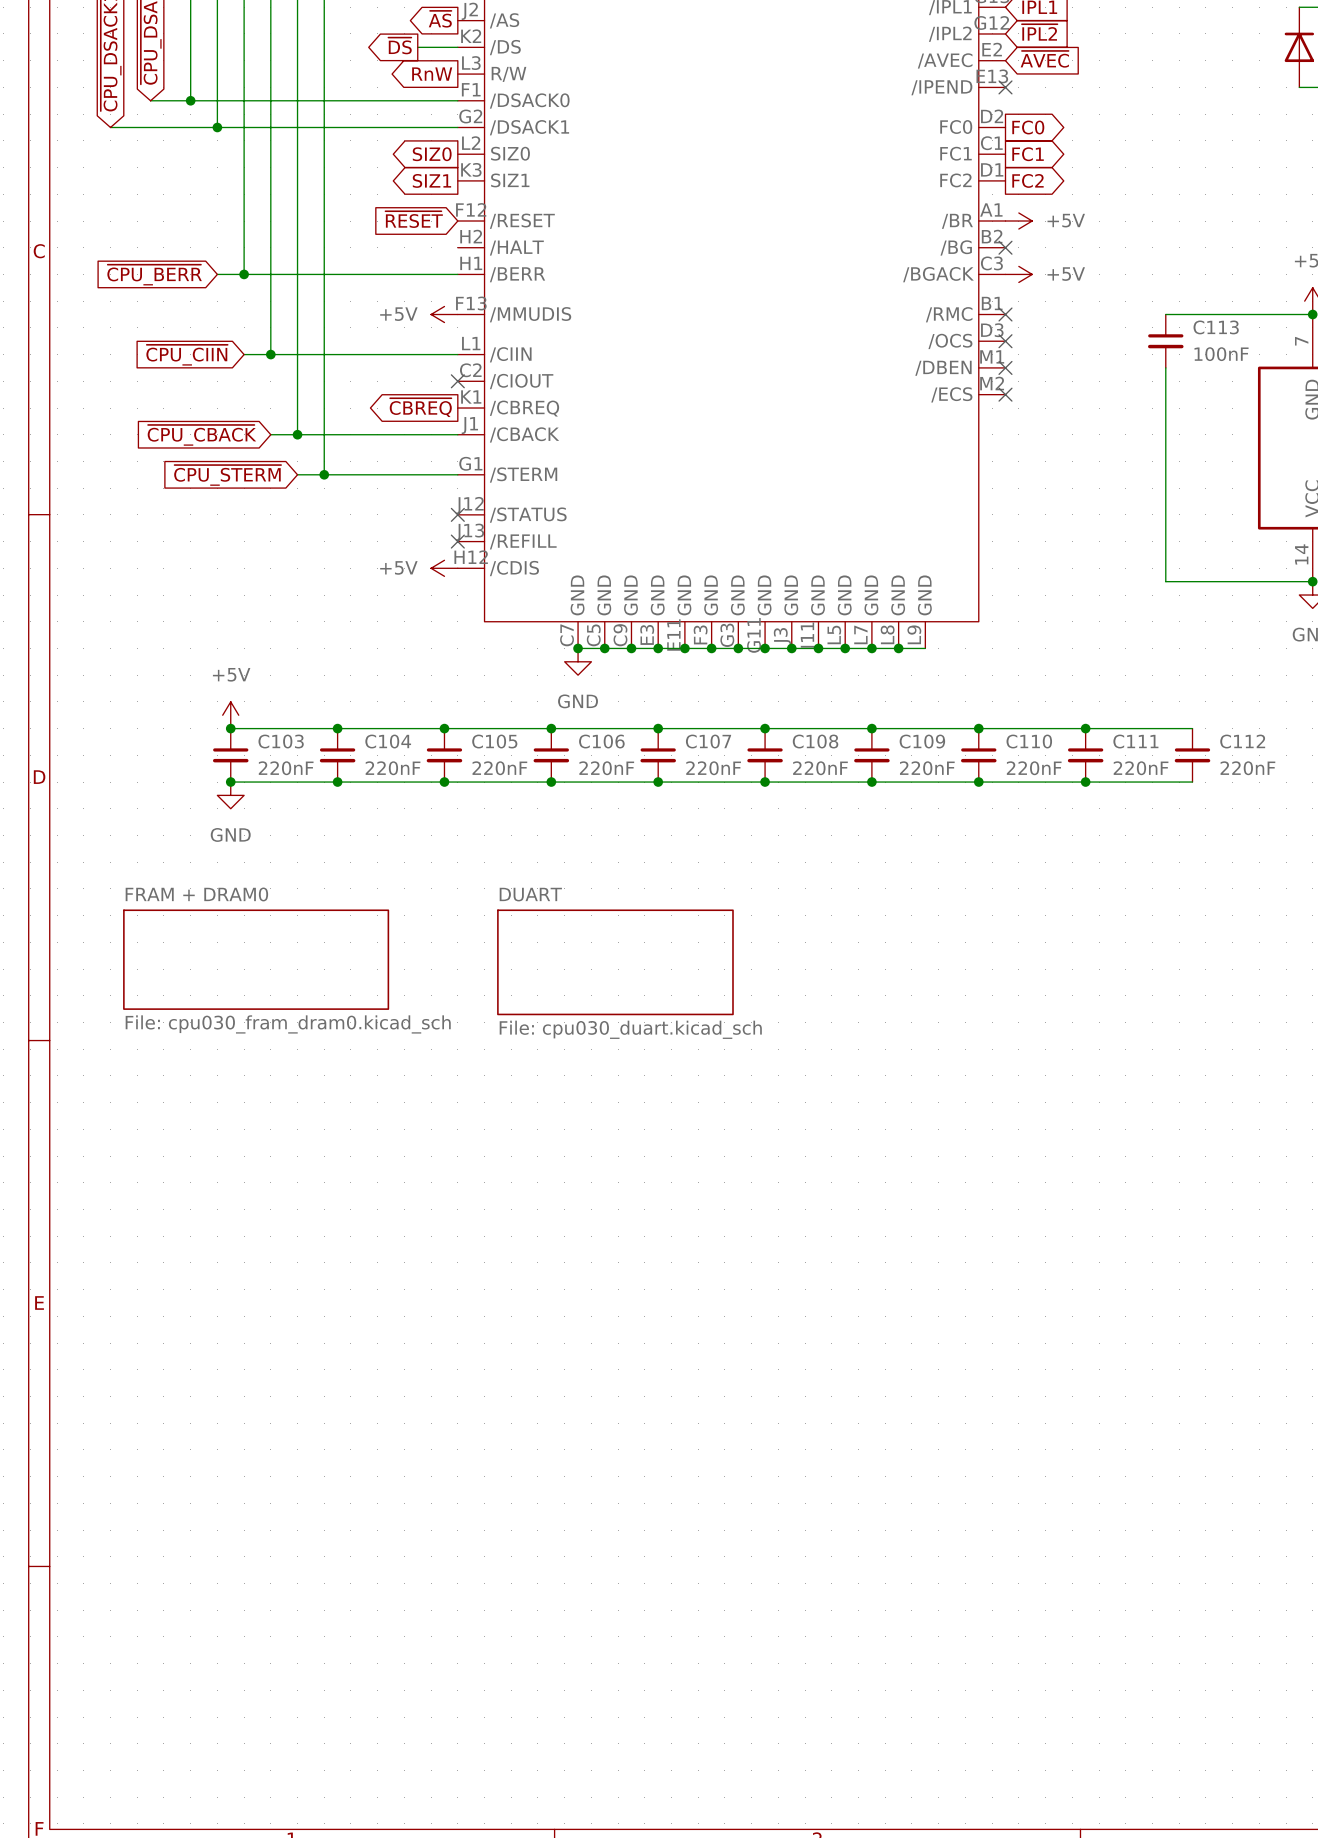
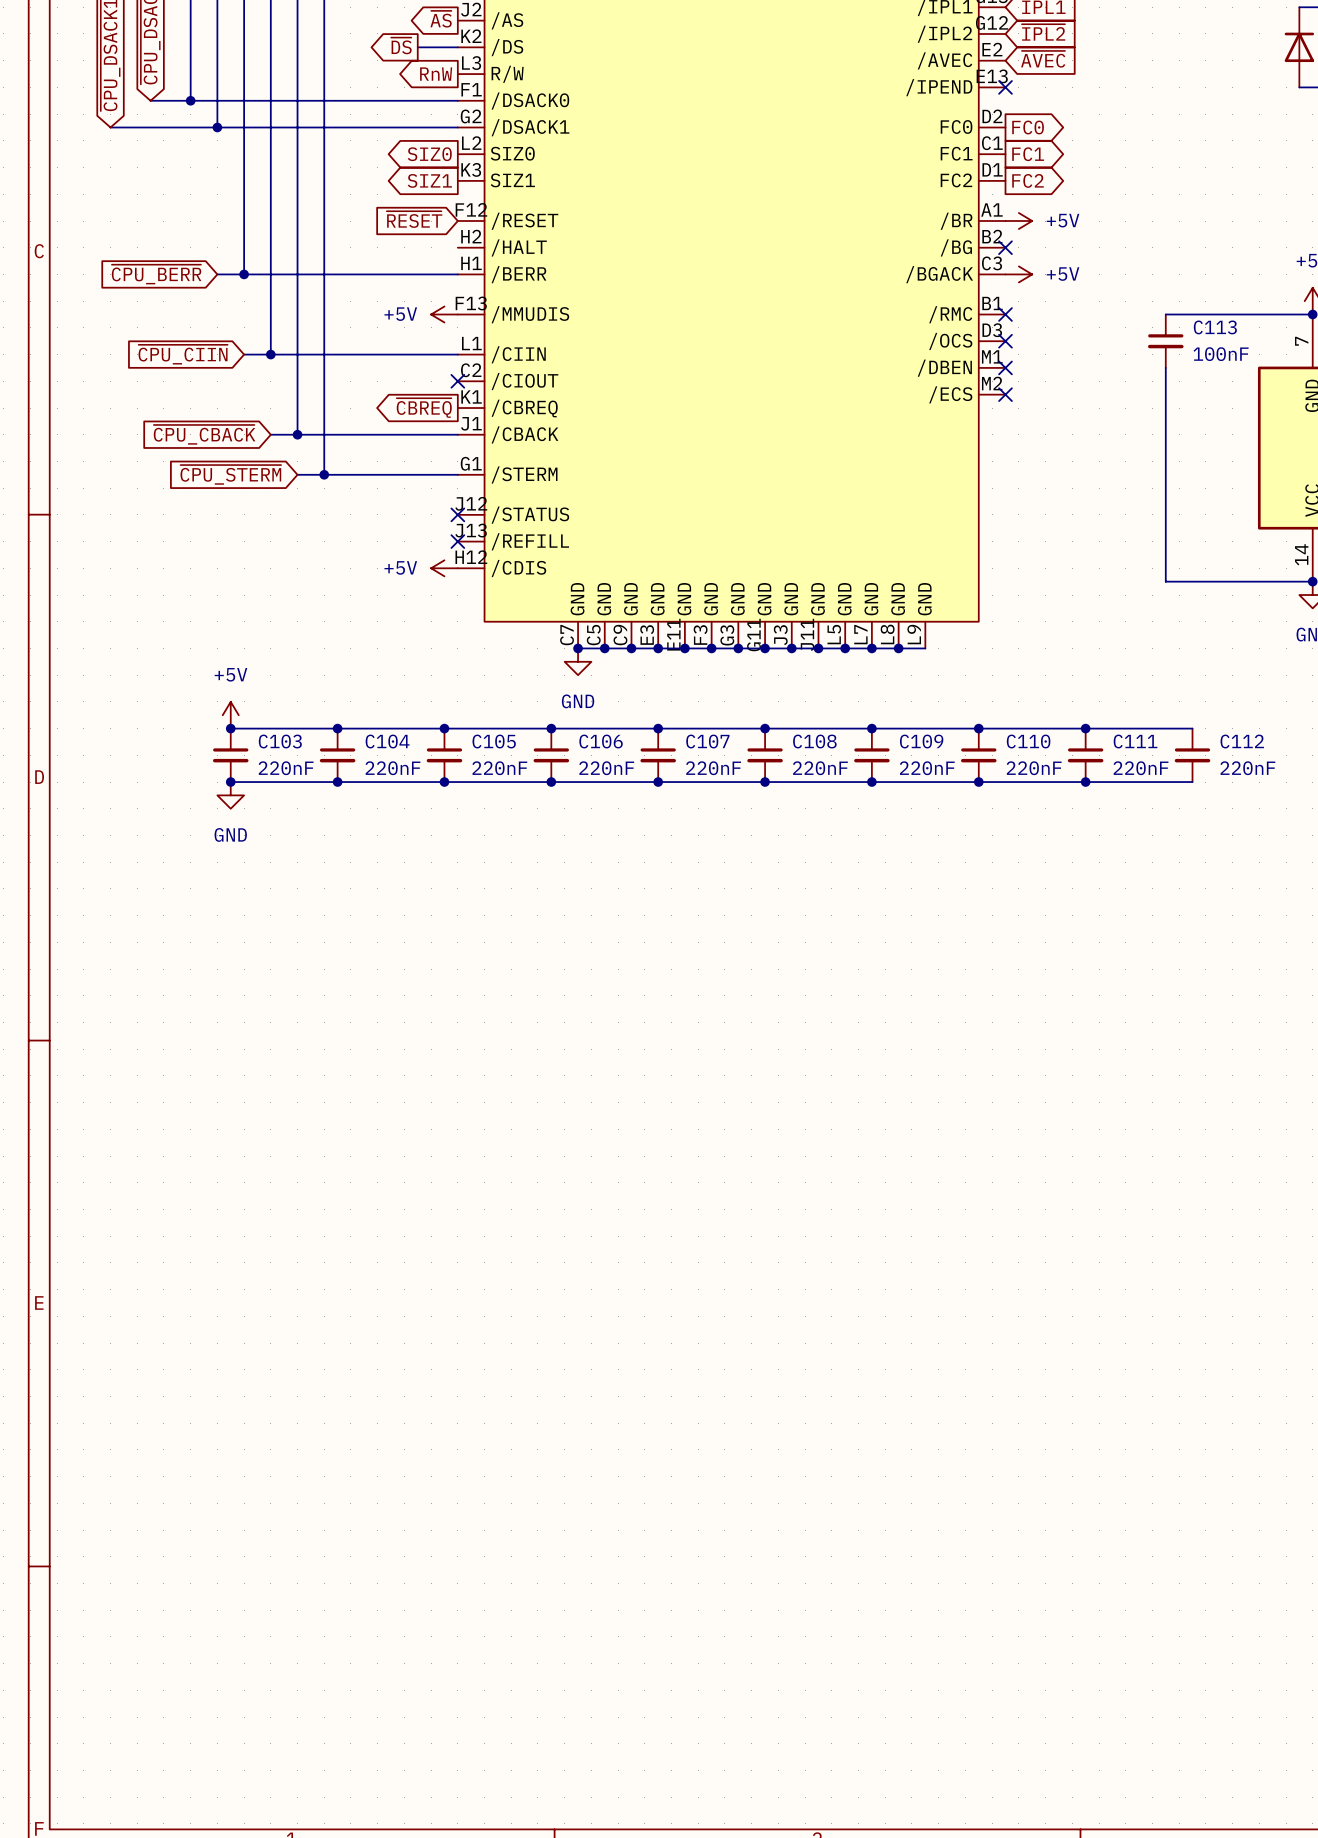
sheet FRAM + DRAM0: File: cpu030_fram_dram0.kicad_sch (256, 959) -> none
sheet DUART: File: cpu030_duart.kicad_sch (615, 962) -> none

